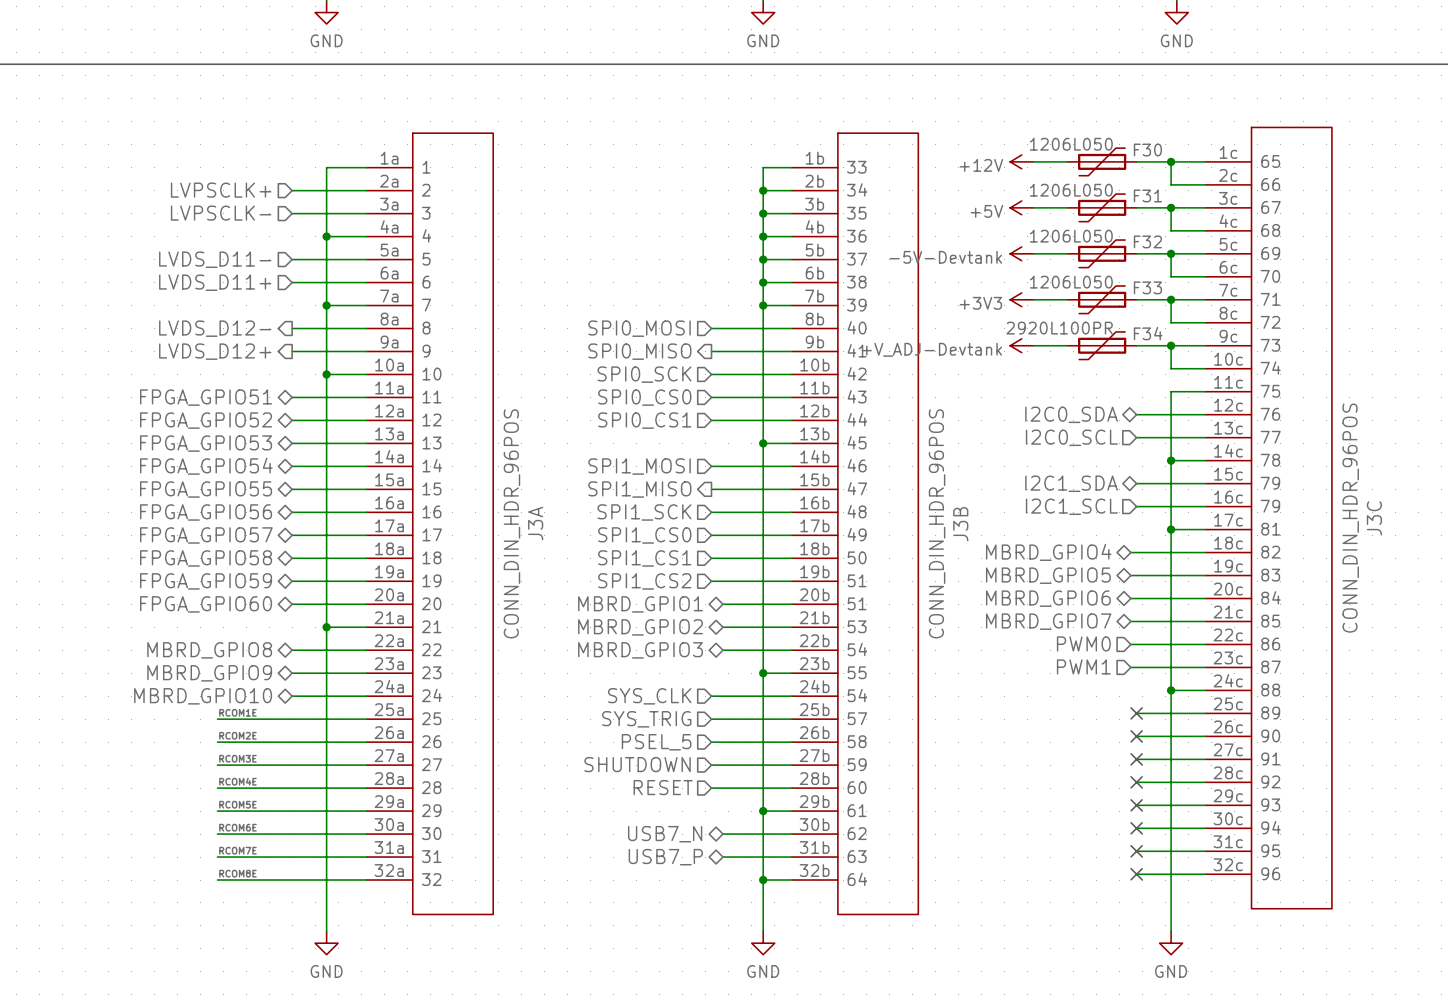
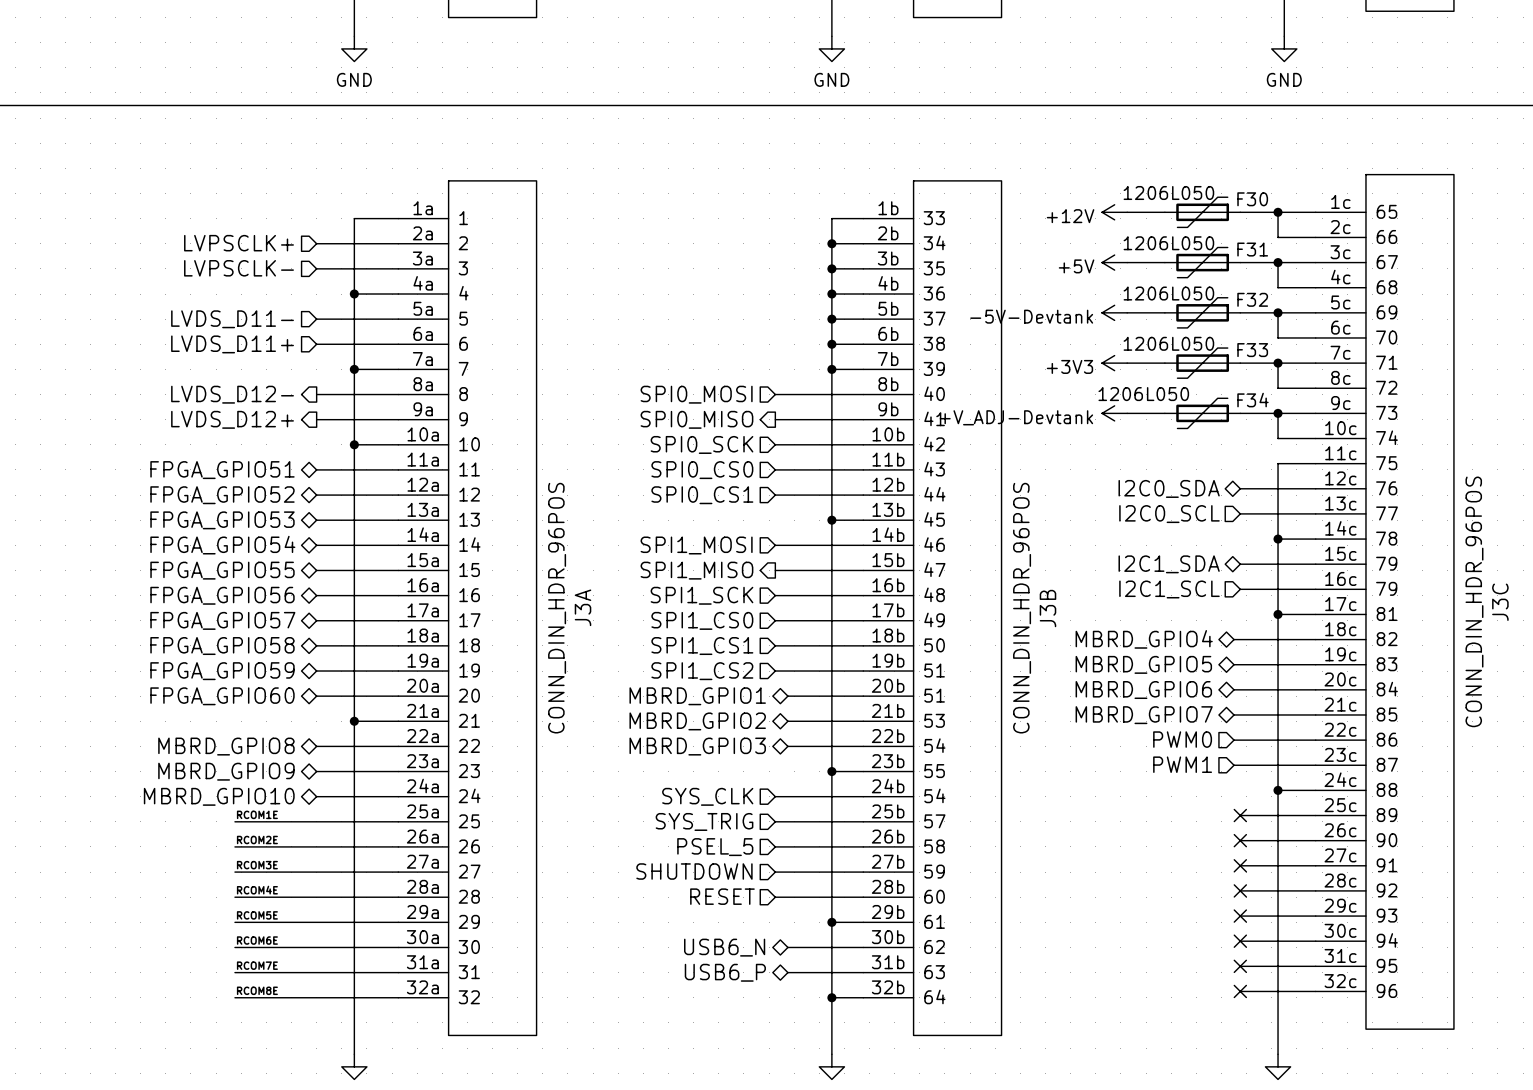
F34 value: 2920L100PR (1059, 328) -> 1206L050 (1143, 394)
hierarchical label: USB7_N (665, 834) -> USB6_N (724, 947)
hierarchical label: USB7_P (665, 857) -> USB6_P (725, 972)

